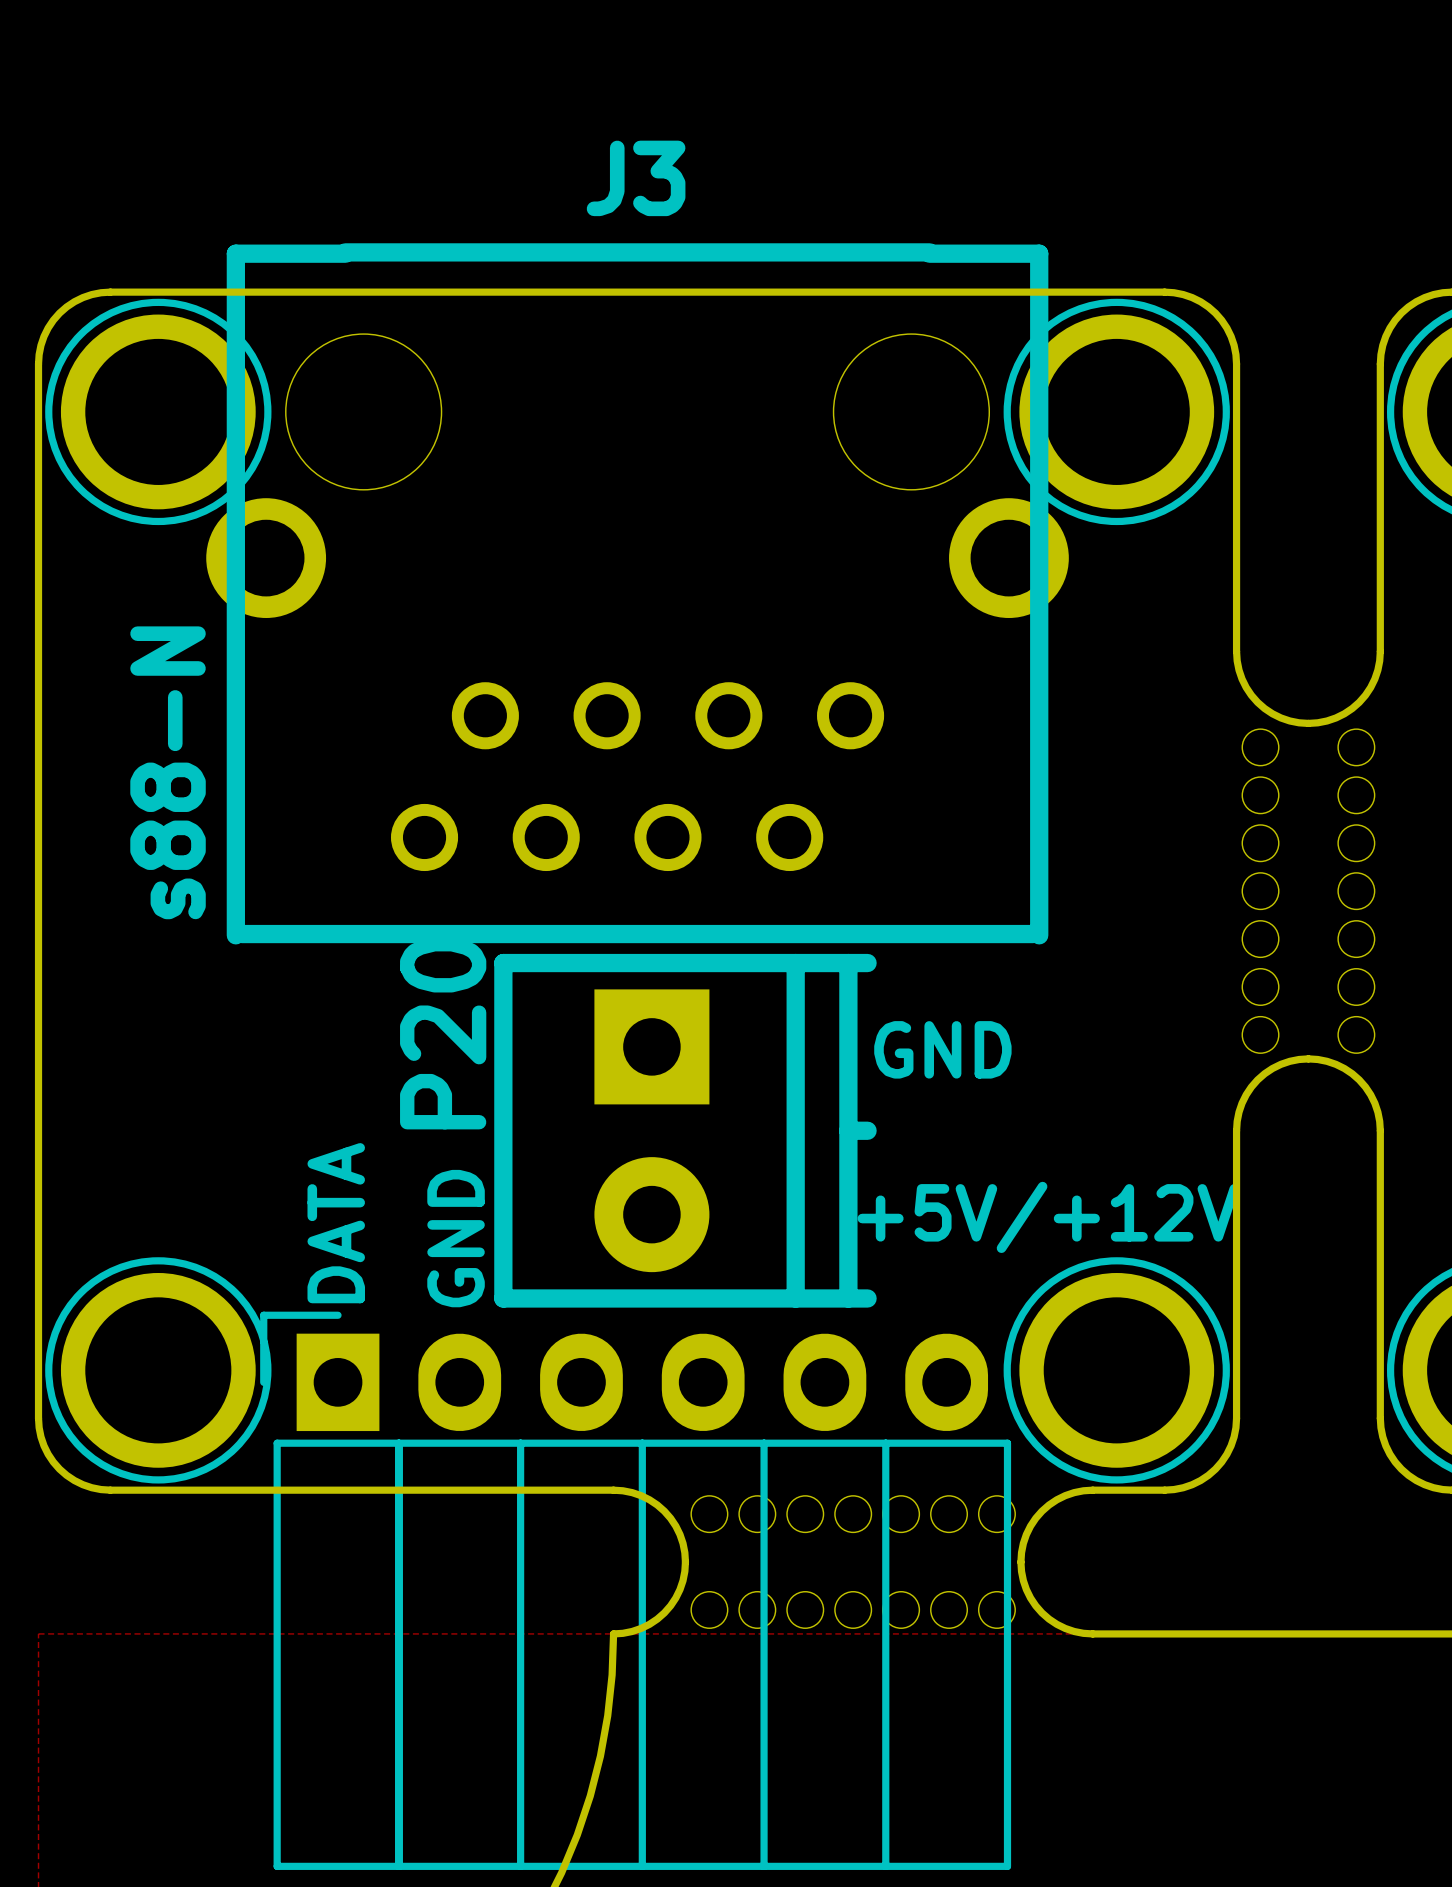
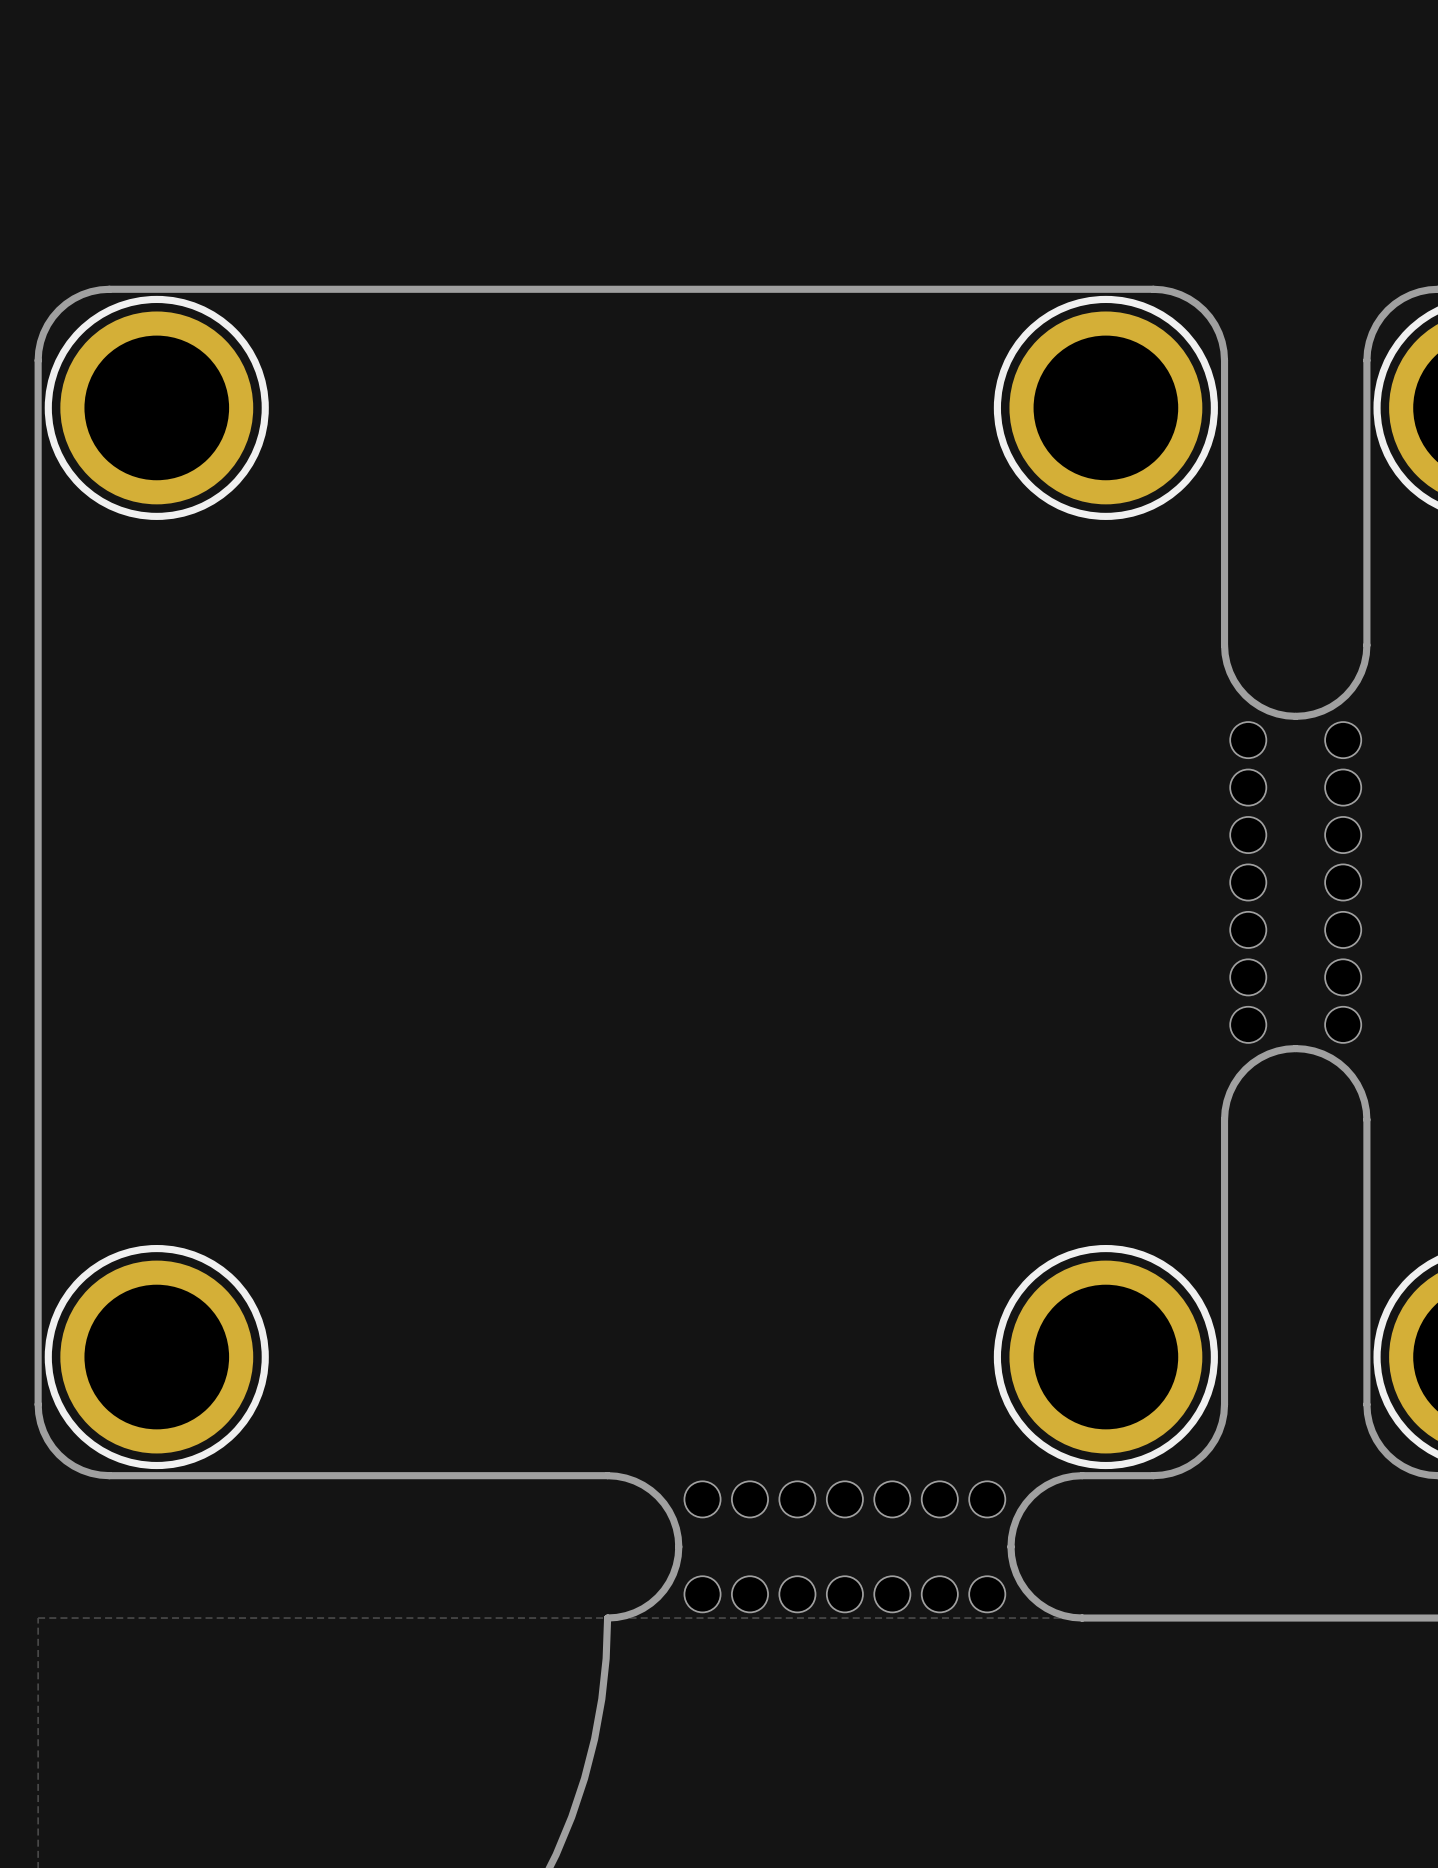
J3: s88-N (637, 593) -> none
text: GND (942, 1049) -> none
P20: (685, 1130) -> none
text: +5V/+12V (1048, 1217) -> none
text: DATA (336, 1223) -> none
text: GND (456, 1238) -> none
part: (635, 1590) -> none

